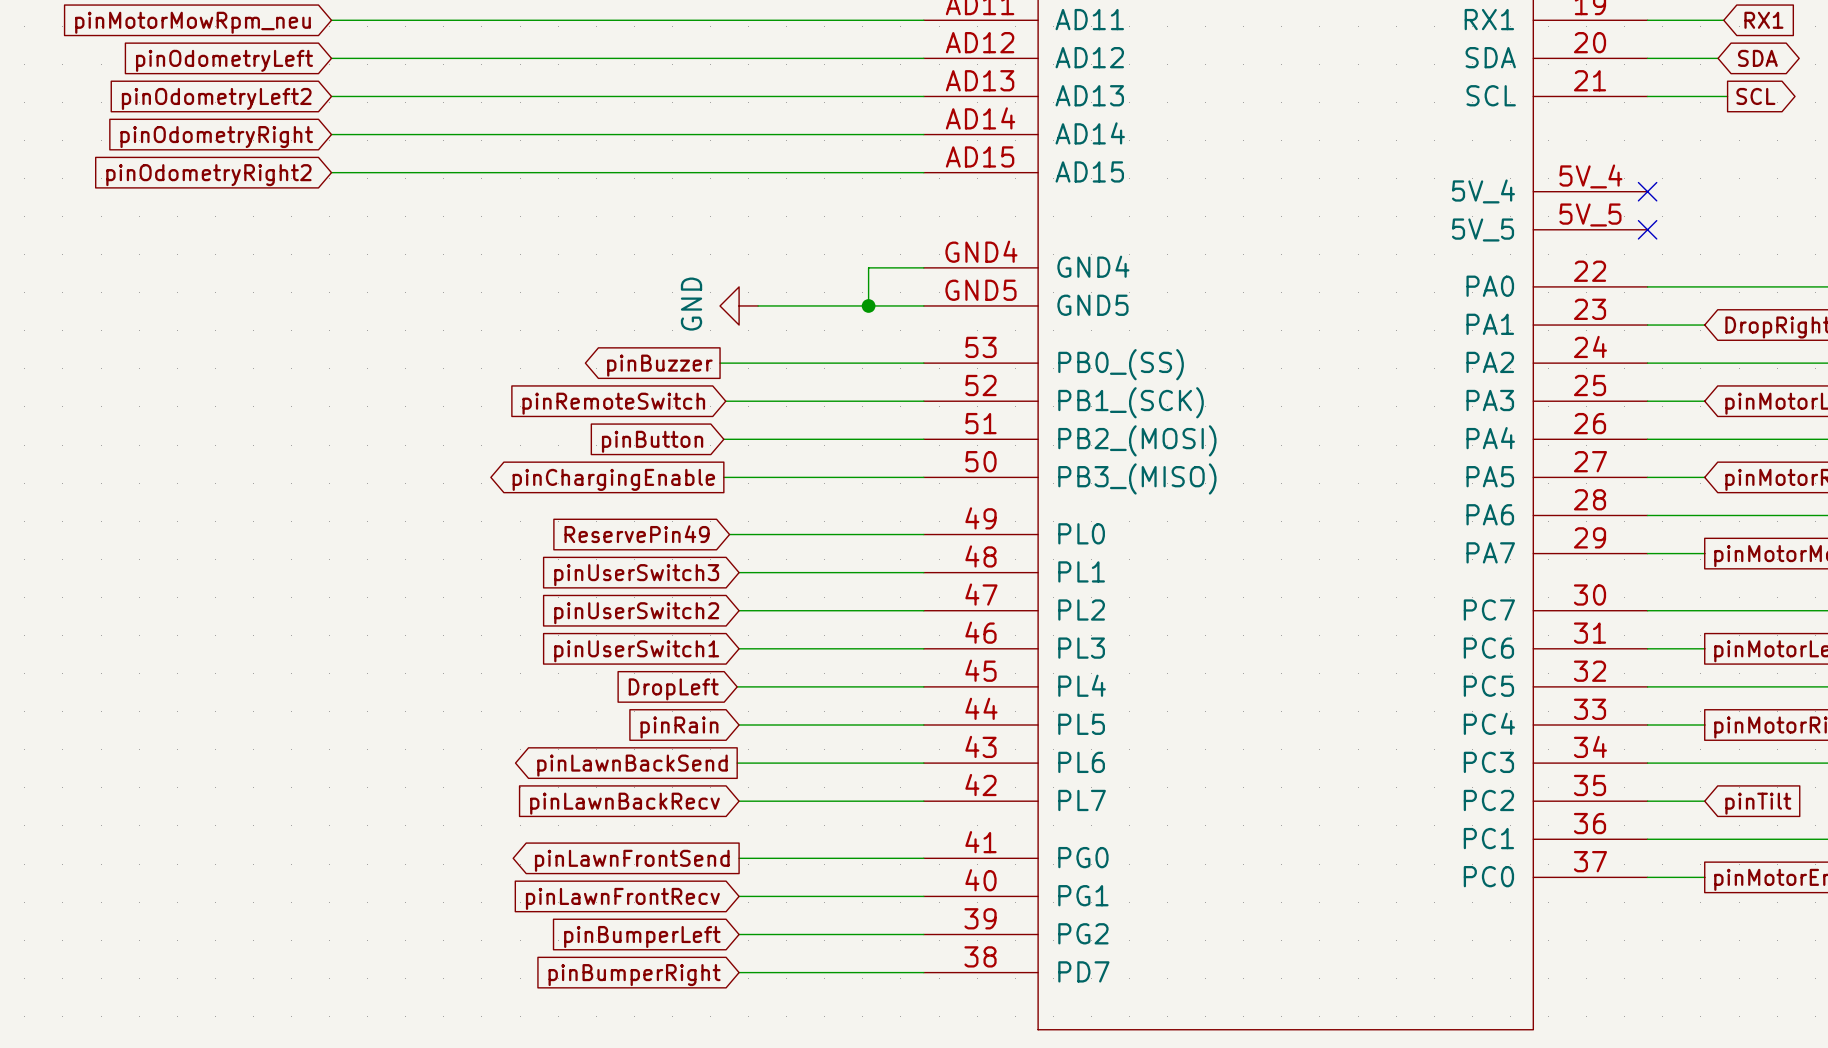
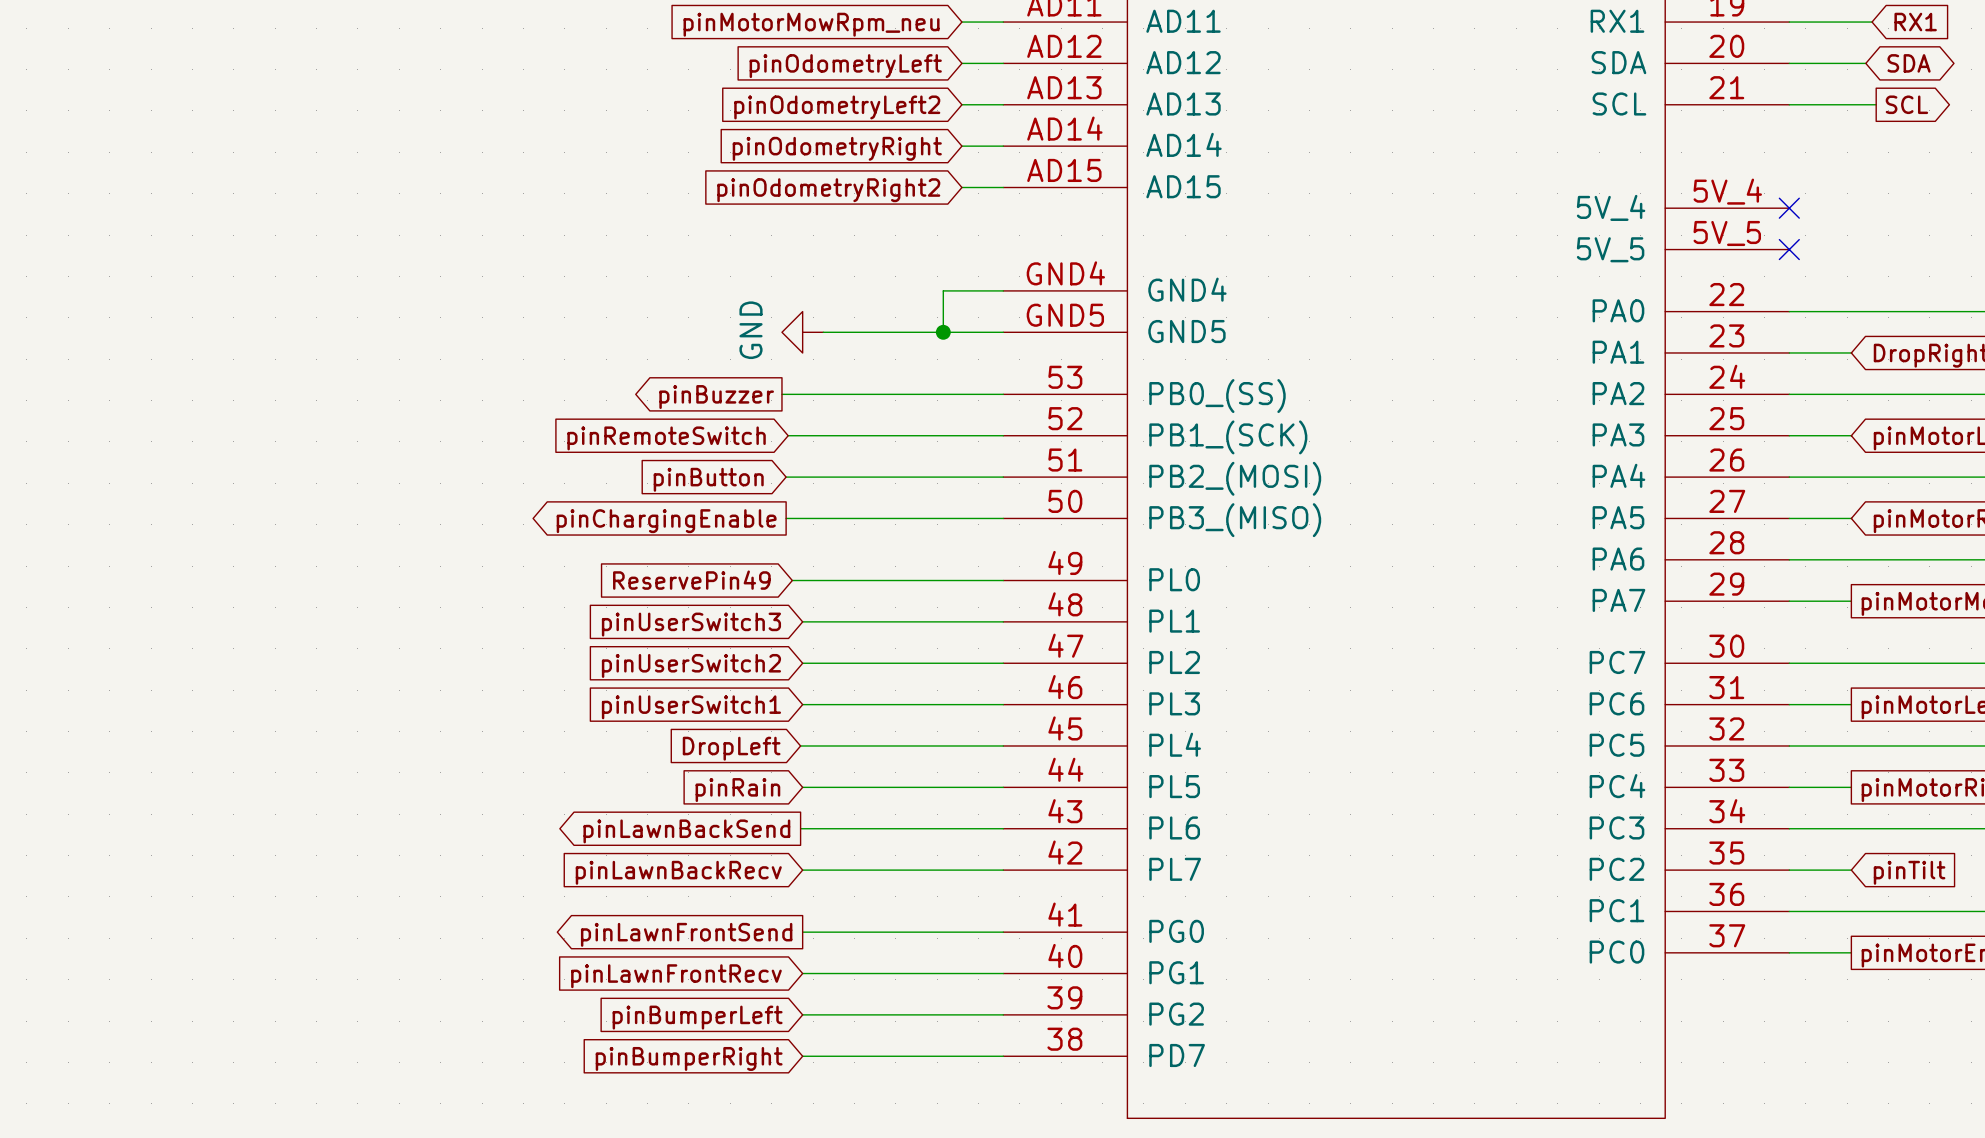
wire: (331, 20) (885, 20) -> none
global label: pinMotorMowRpm_neu (193, 22) -> none
global label: none -> pinMotorMowRpm_neu (811, 24)
wire: (331, 58) (885, 58) -> none
global label: pinOdometryLeft (224, 60) -> none
global label: none -> pinOdometryLeft (845, 66)
wire: (331, 96) (885, 96) -> none
global label: pinOdometryLeft2 (216, 98) -> none
global label: none -> pinOdometryLeft2 (837, 107)
wire: (331, 134) (885, 134) -> none
global label: pinOdometryRight (216, 137) -> none
global label: none -> pinOdometryRight (837, 148)
wire: (331, 172) (885, 172) -> none
global label: pinOdometryRight2 (208, 175) -> none
global label: none -> pinOdometryRight2 (828, 190)

